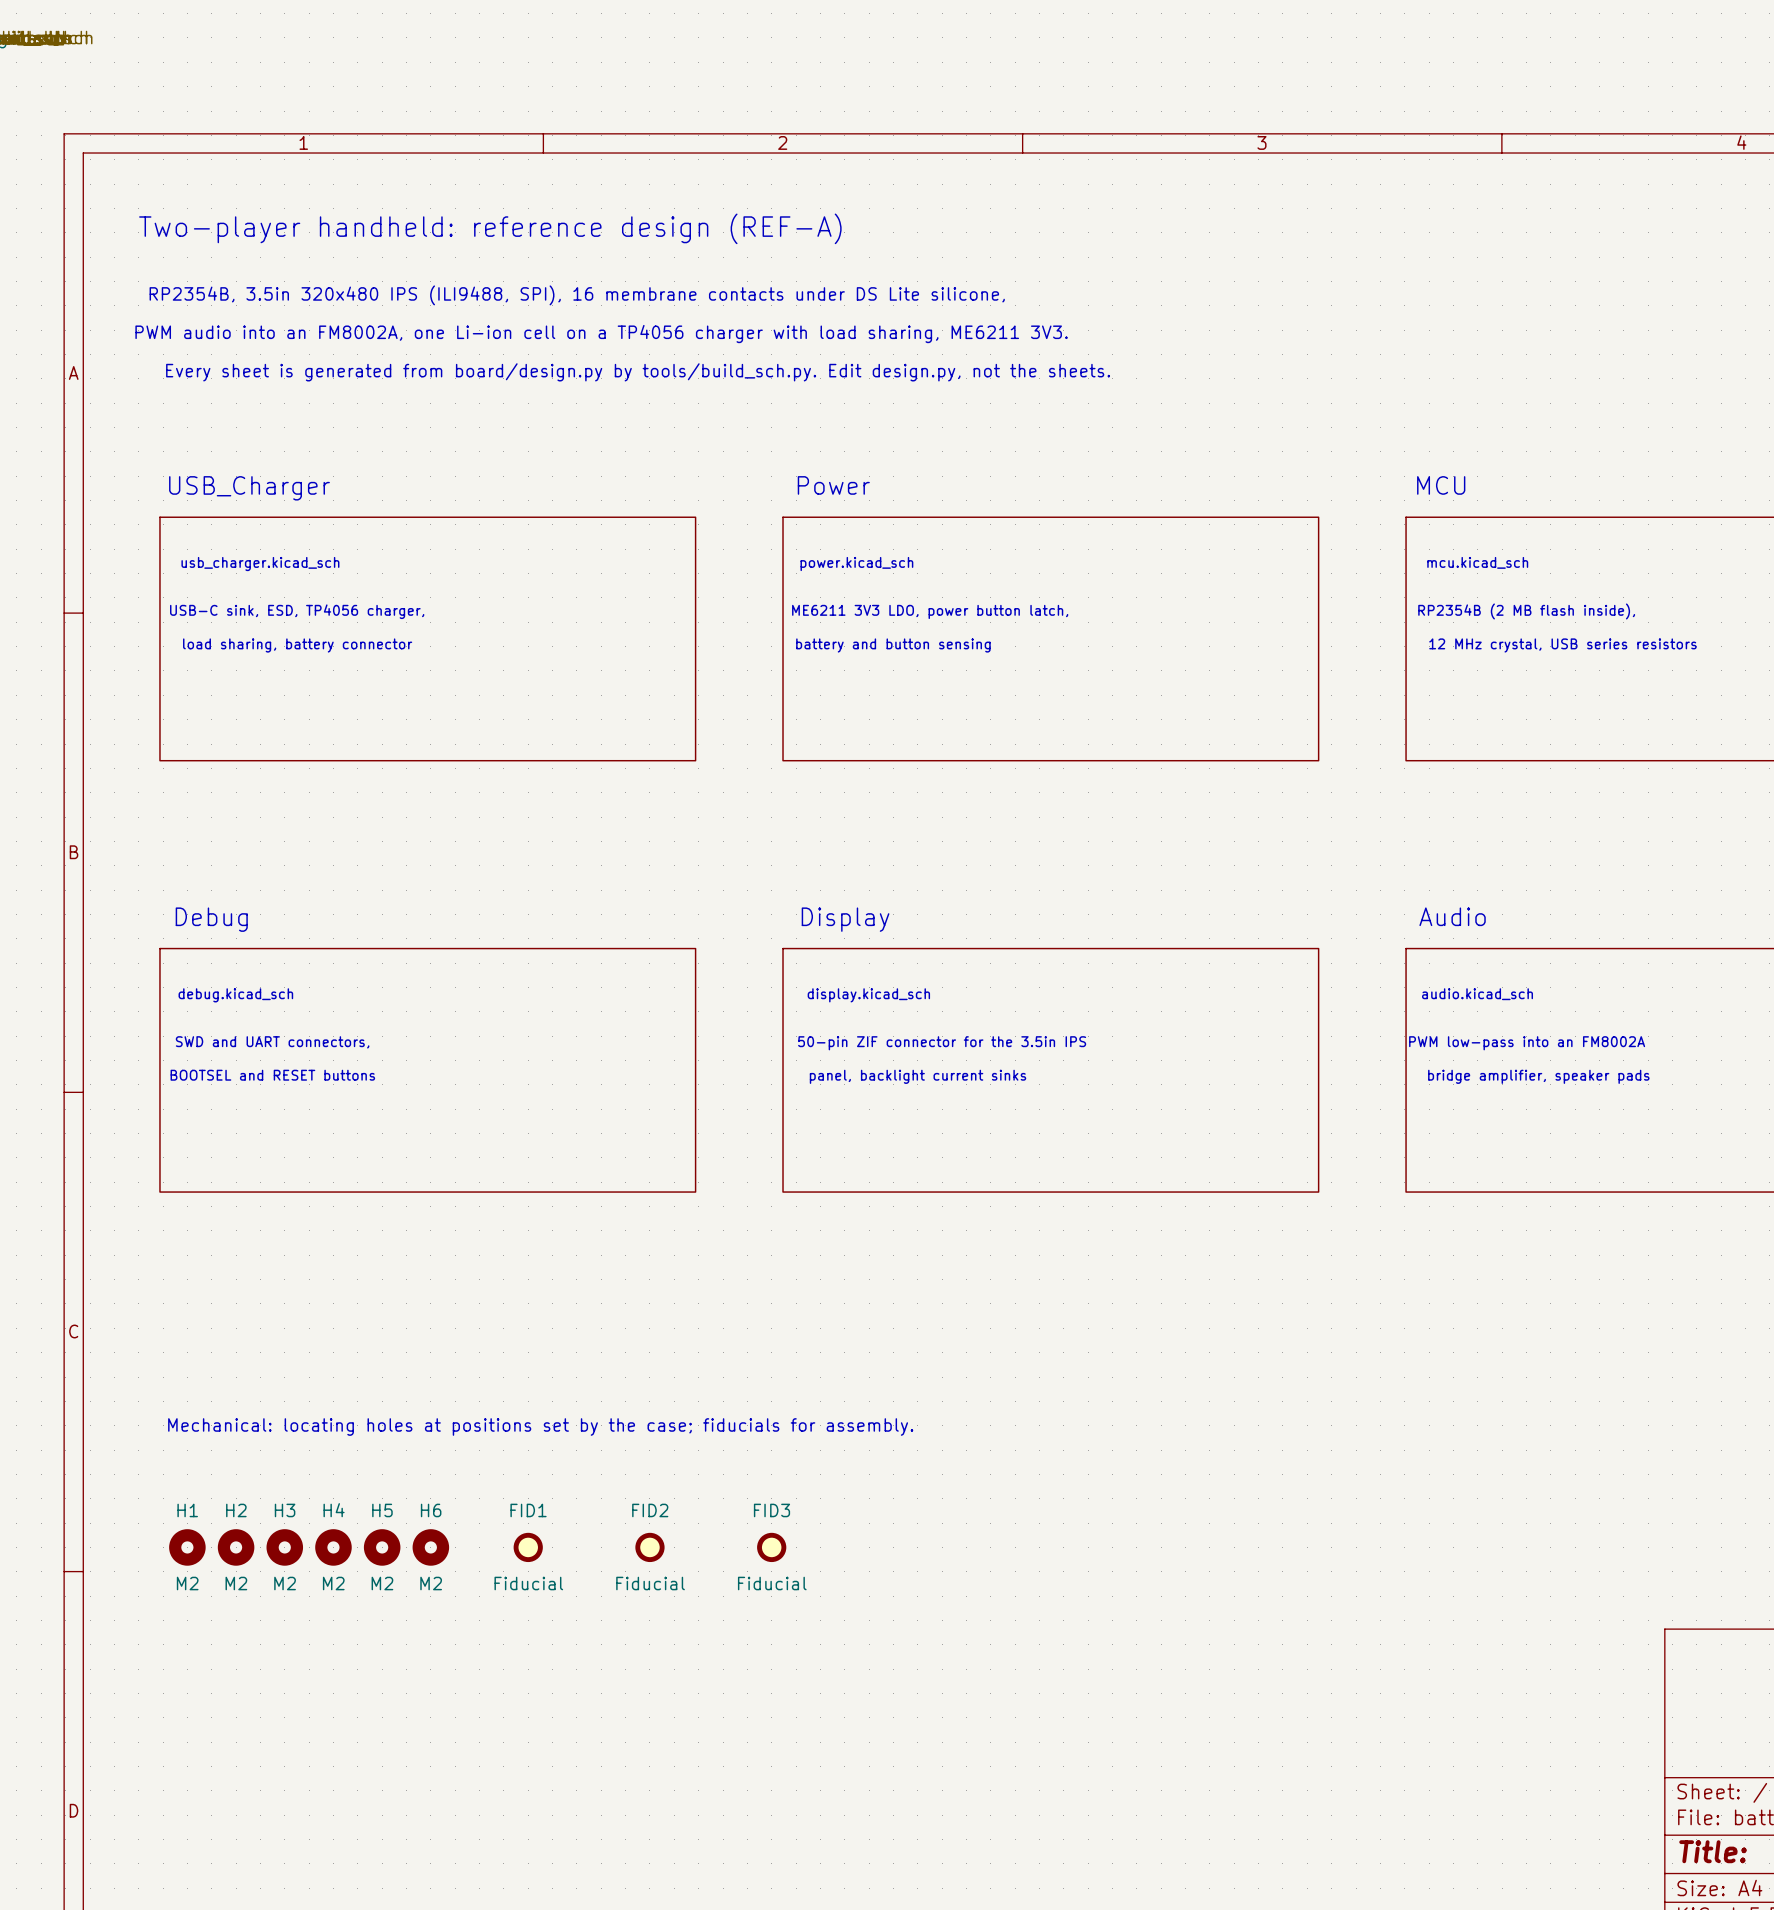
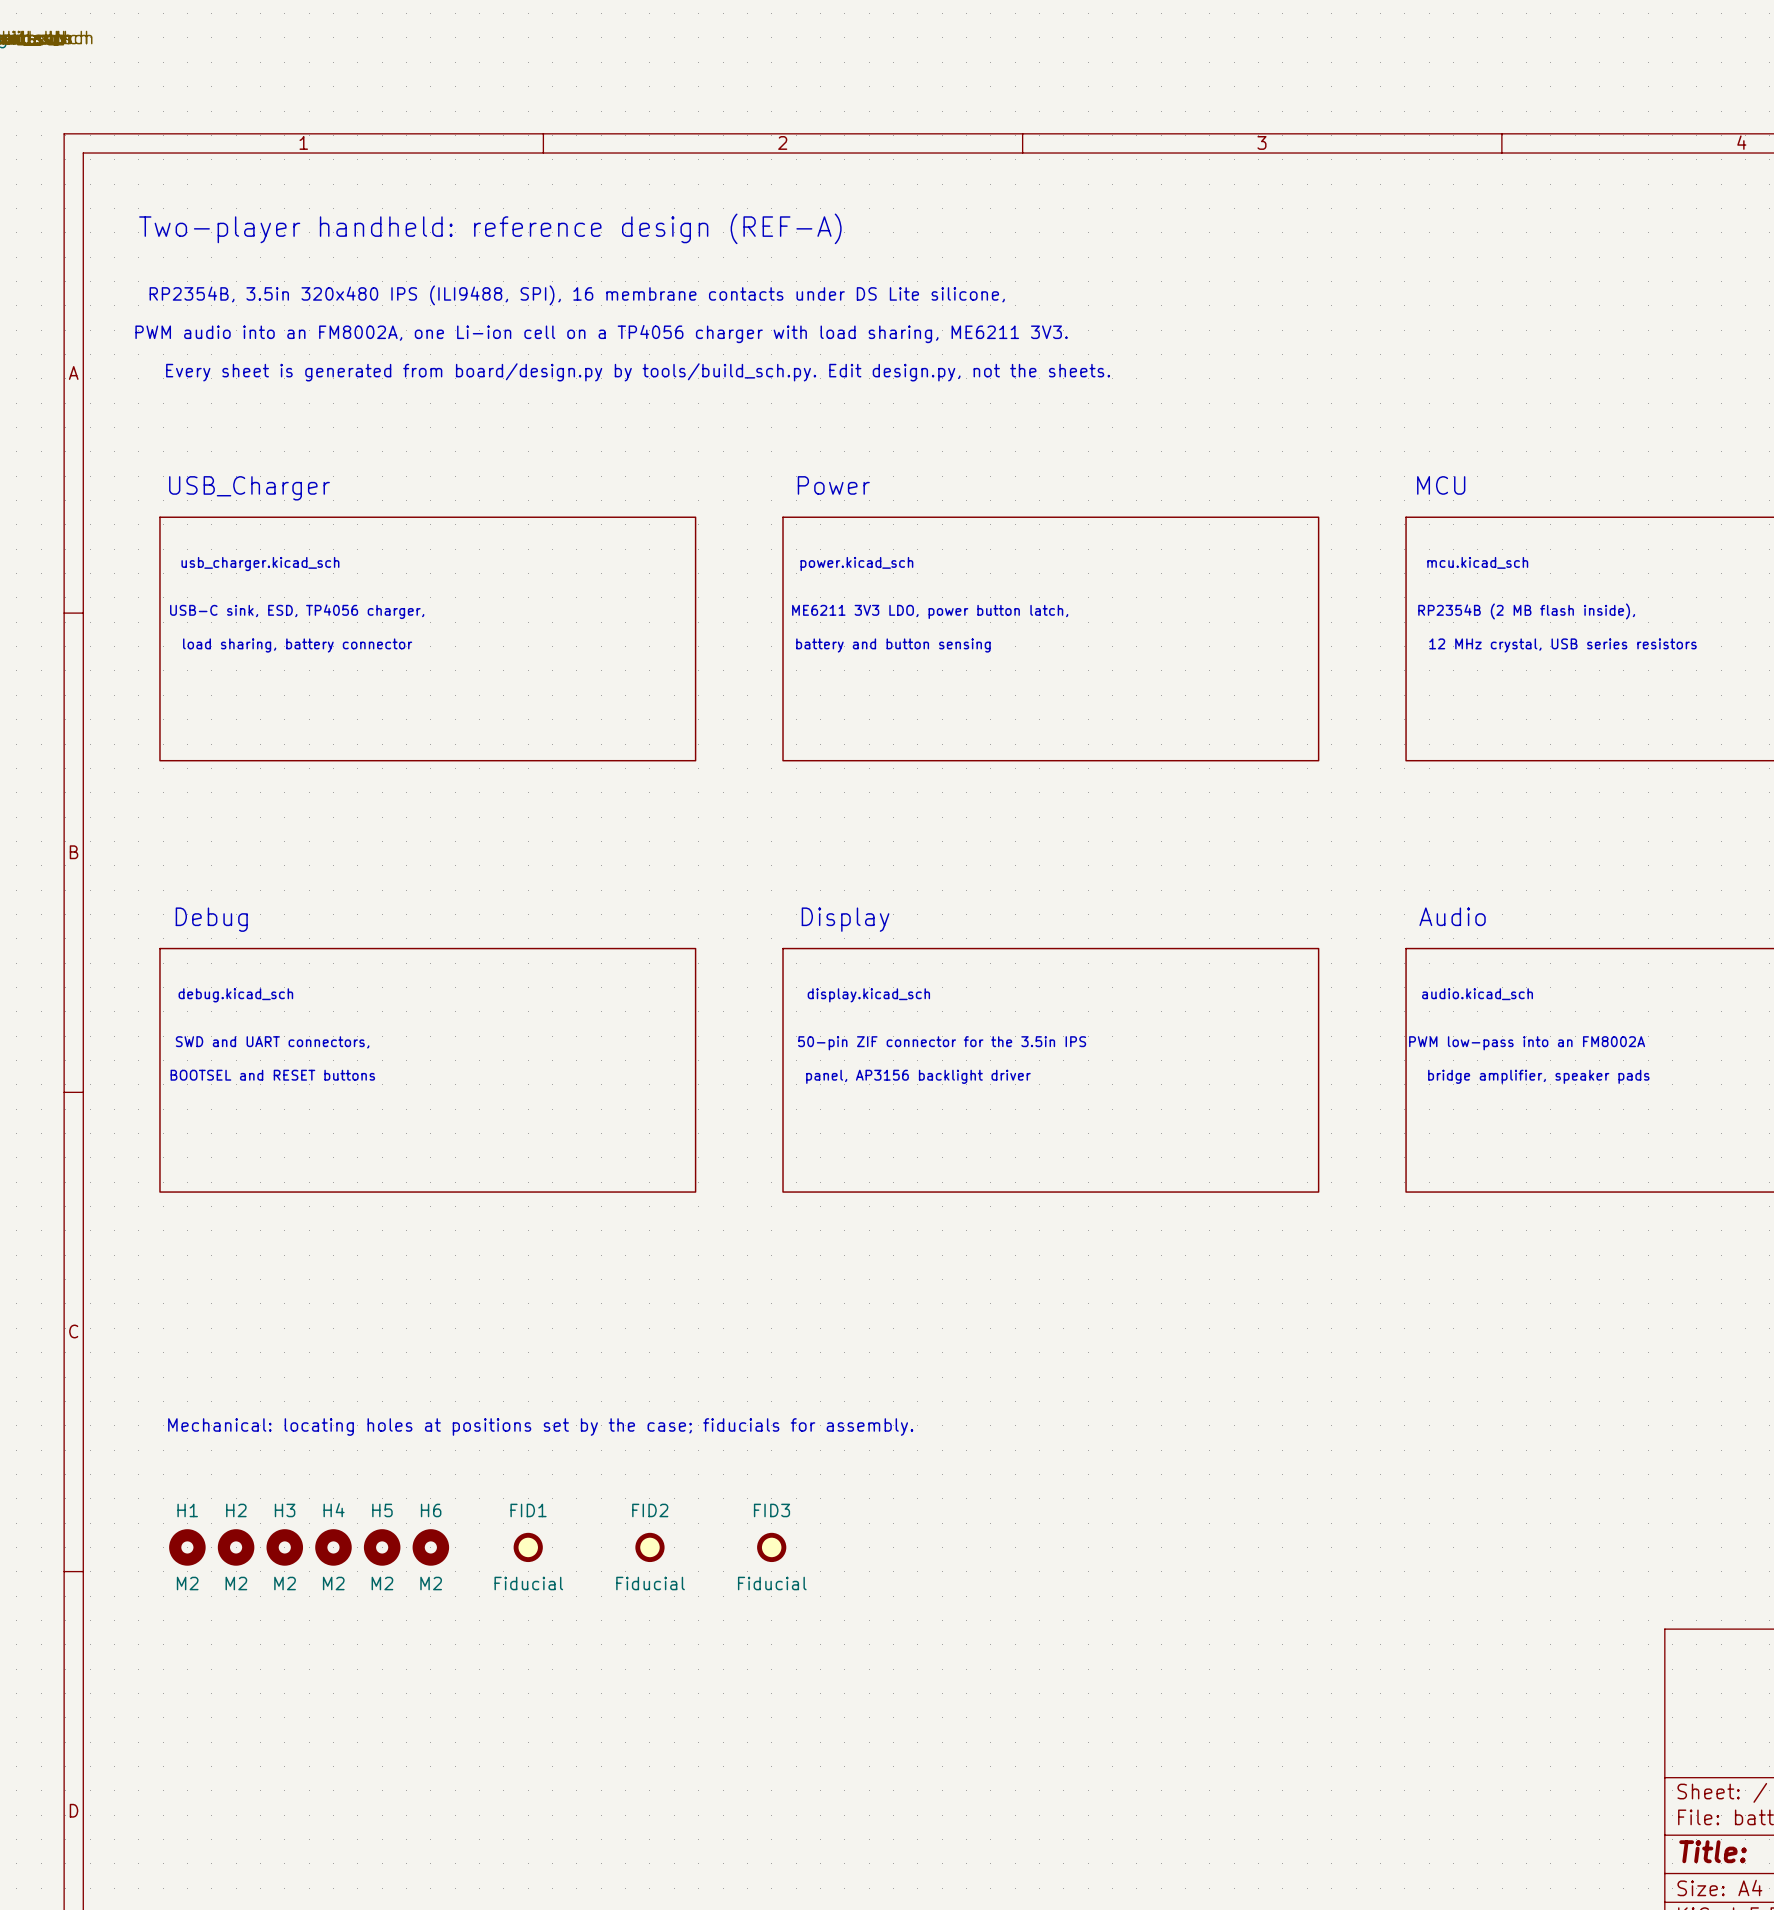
text: panel, backlight current sinks (918, 1076) -> panel, AP3156 backlight driver (918, 1076)

